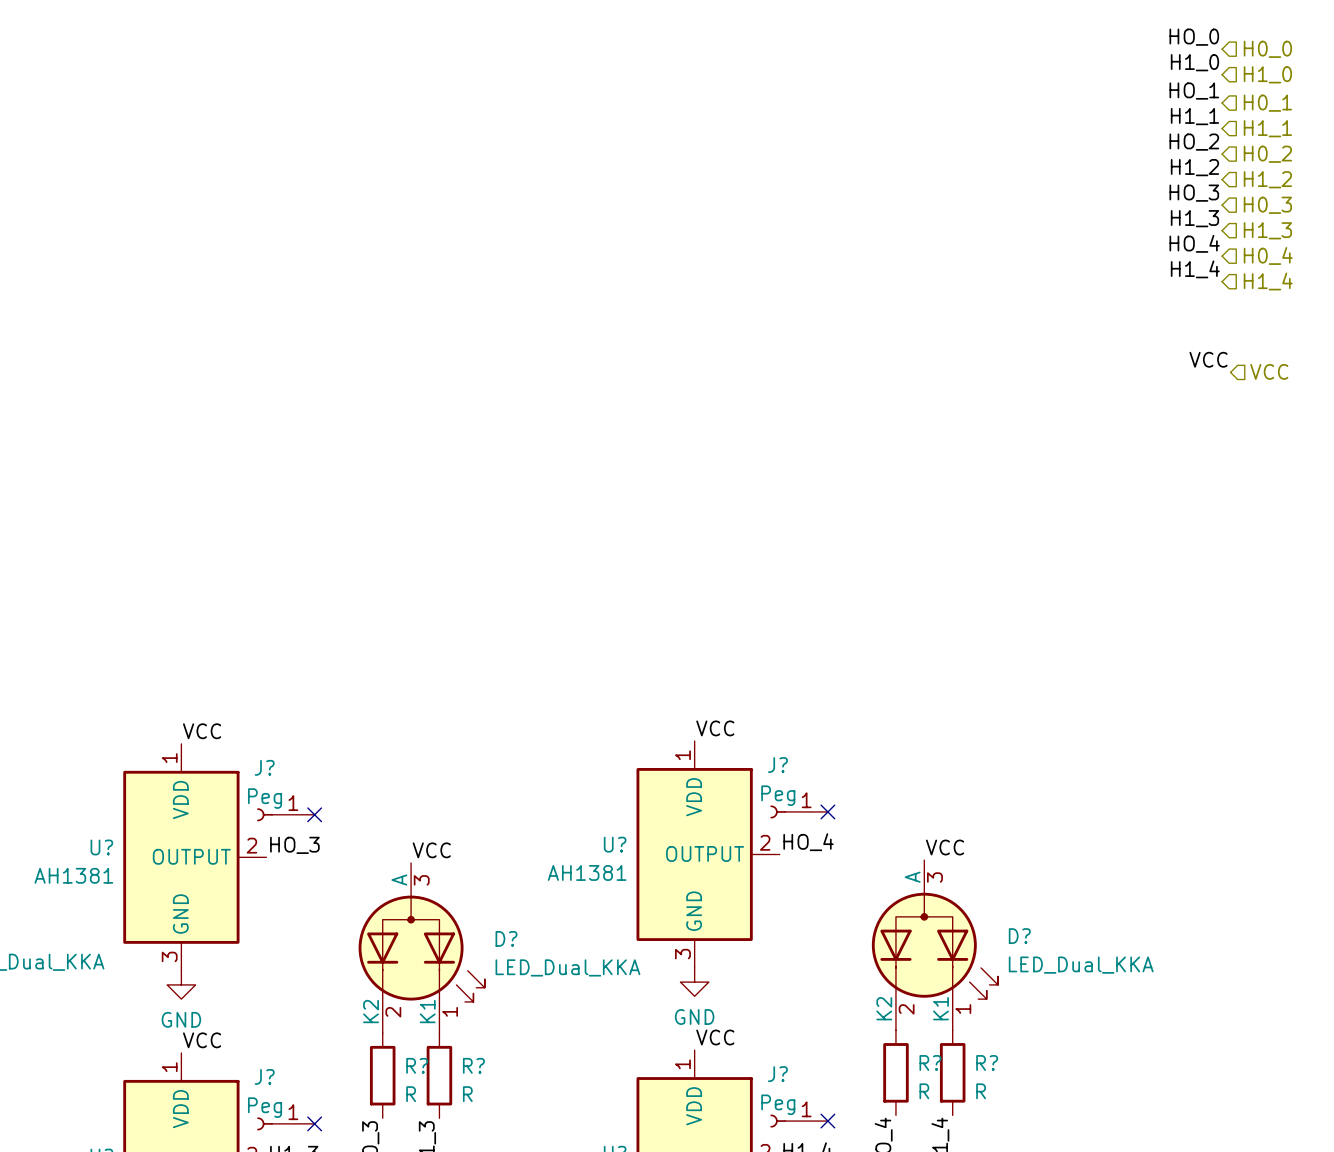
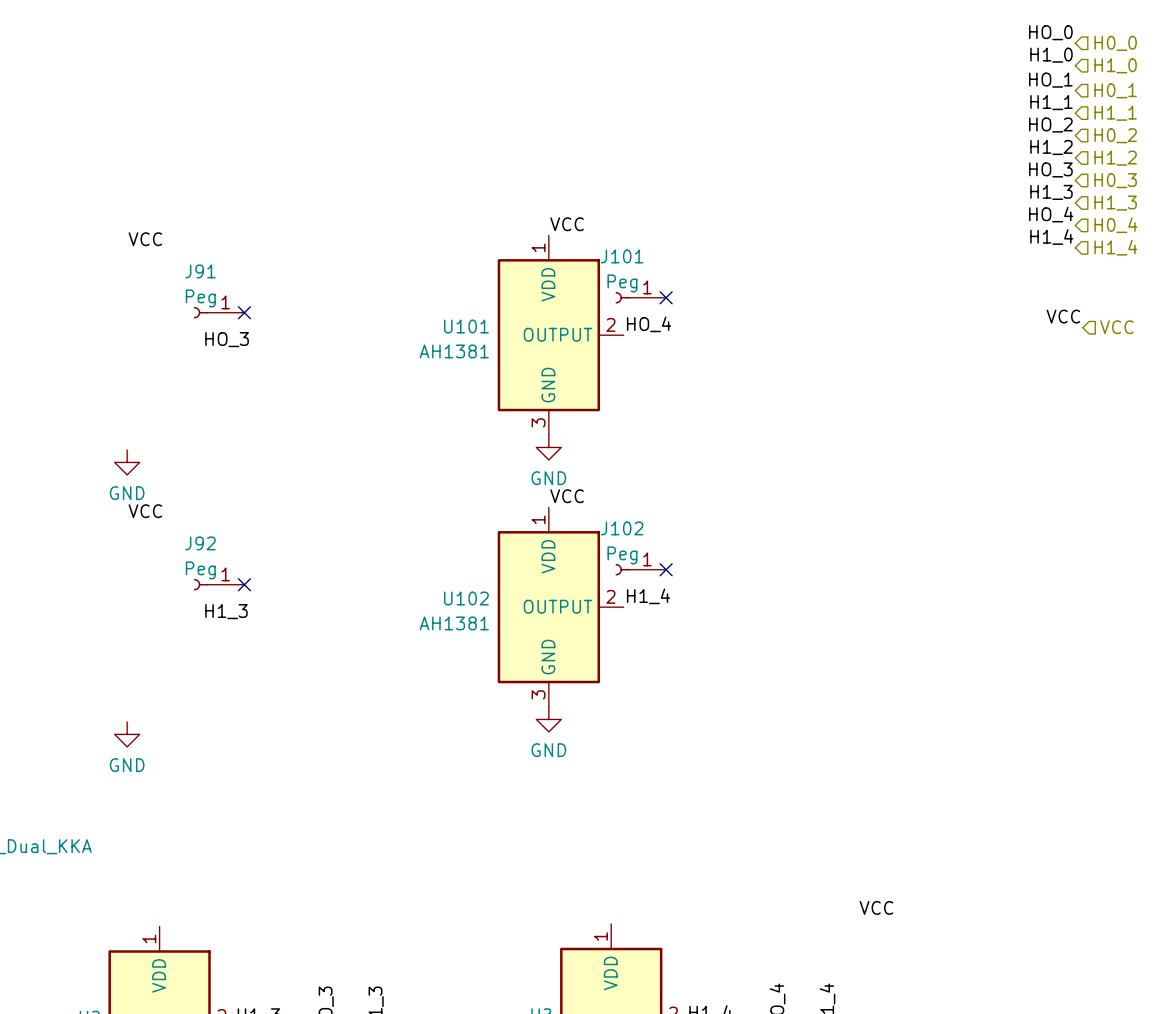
label: none -> VCC (567, 224)
label: none -> VCC (145, 239)
J101: none -> Peg (640, 297)
no-connect mark: none -> (666, 297)
J91: none -> Peg (219, 312)
no-connect mark: none -> (244, 312)
label: none -> HO_4 (649, 324)
U101: none -> AH1381 (560, 335)
label: none -> HO_3 (227, 339)
power symbol: none -> GND (548, 447)
power symbol: none -> GND (127, 462)
label: none -> VCC (567, 496)
J102: none -> Peg (640, 569)
no-connect mark: none -> (666, 569)
J92: none -> Peg (219, 584)
no-connect mark: none -> (244, 584)
label: none -> H1_4 (648, 596)
U102: none -> AH1381 (560, 607)
label: none -> H1_3 (226, 611)
label: VCC (715, 728) -> none
label position: VCC (202, 731) -> VCC (145, 511)
J?: Peg (799, 811) -> none
no-connect mark: (827, 811) -> none
J?: Peg (285, 814) -> none
no-connect mark: (314, 814) -> none
label: HO_4 (808, 842) -> none
label: HO_3 (294, 845) -> none
label: VCC (945, 847) -> none
label: VCC (431, 850) -> none
U?: AH1381 (708, 854) -> none
U?: AH1381 (194, 857) -> none
D?: LED_Dual_KKA (934, 945) -> none
D?: LED_Dual_KKA (421, 948) -> none
power symbol position: GND (694, 982) -> GND (548, 719)
power symbol position: GND (181, 984) -> GND (127, 734)
label: none -> VCC (876, 907)
label: VCC (715, 1037) -> none
label: VCC (202, 1040) -> none
R?: R (895, 1072) -> none
R?: R (952, 1072) -> none
R?: R (382, 1075) -> none
R?: R (439, 1075) -> none
J?: Peg (799, 1121) -> none
no-connect mark: (827, 1121) -> none
J?: Peg (285, 1123) -> none
no-connect mark: (314, 1123) -> none

